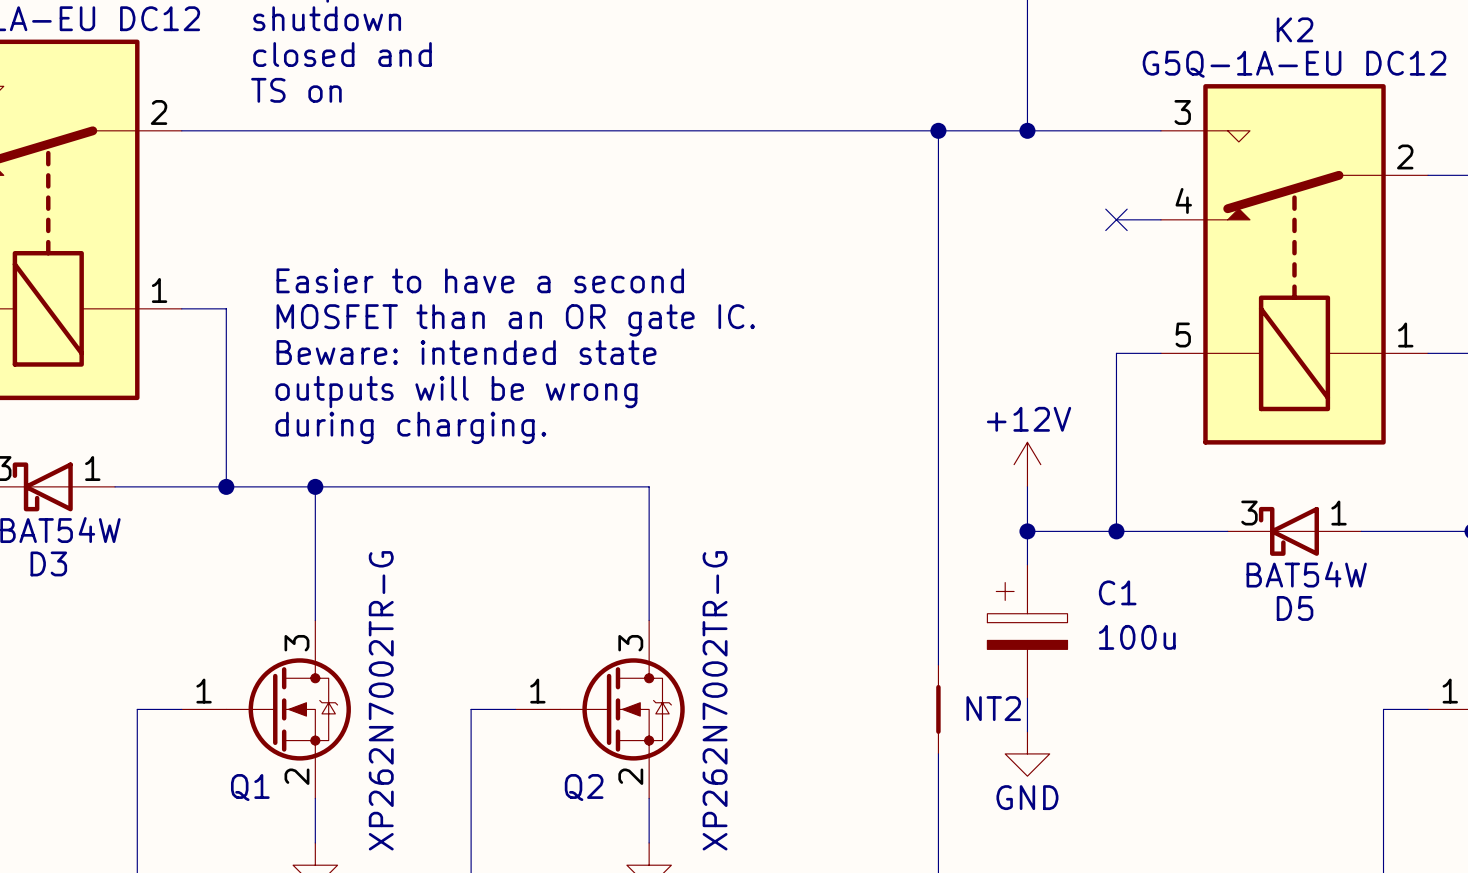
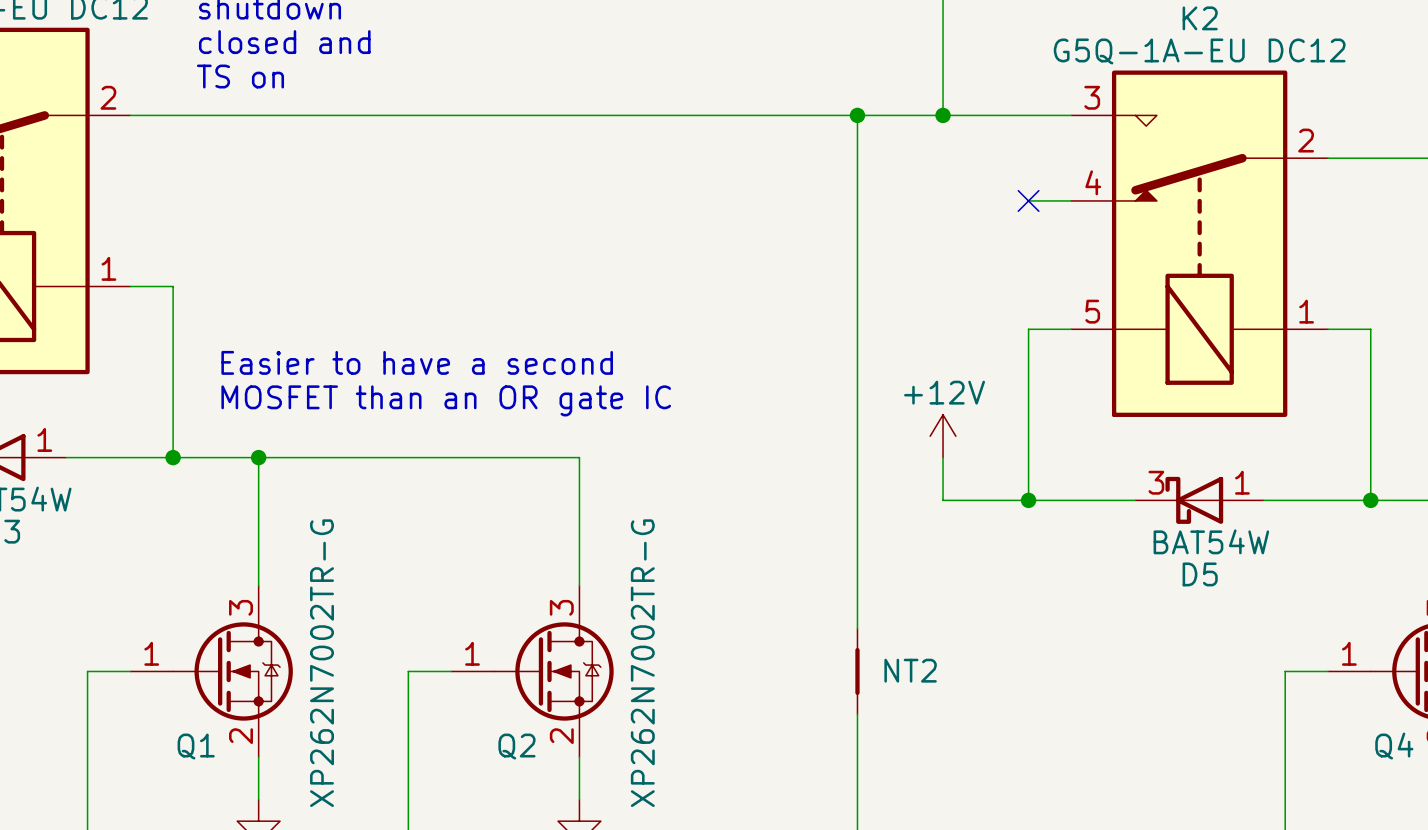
text: Easier to have a second (480, 280) -> none
text: MOSFET than an OR gate IC. (515, 320) -> none
text: Beware: intended state (466, 352) -> none
text: outputs will be wrong (456, 392) -> Easier to have a second (417, 362)
text: during charging. (410, 427) -> MOSFET than an OR gate IC (446, 400)
wire: (1027, 531) (1027, 564) -> none
junction: (1027, 531) -> none
C1: 100u (1027, 631) -> none
wire: (1027, 698) (1027, 731) -> none
power symbol: GND (1027, 753) -> none

